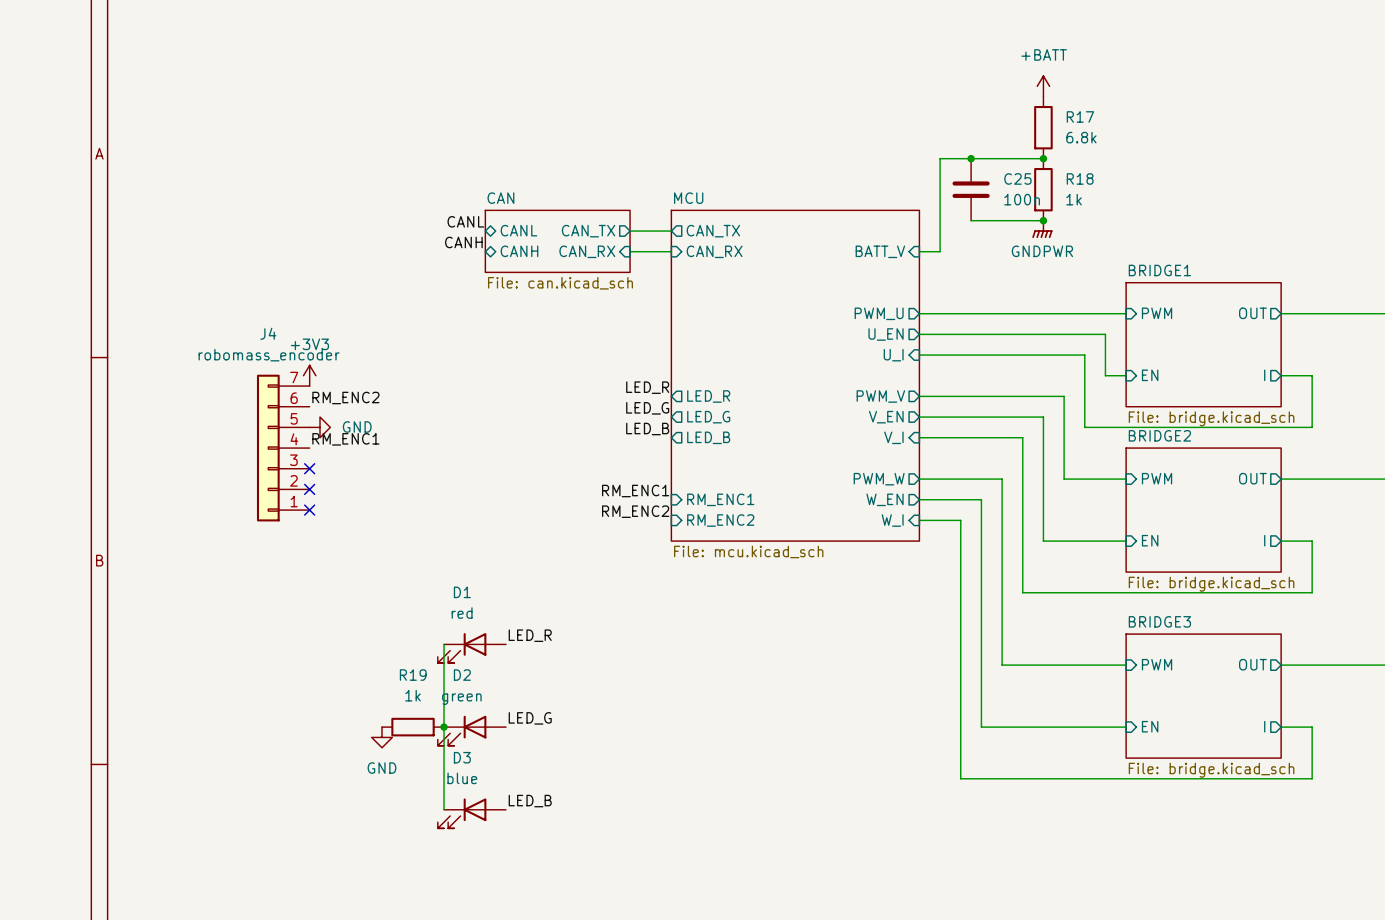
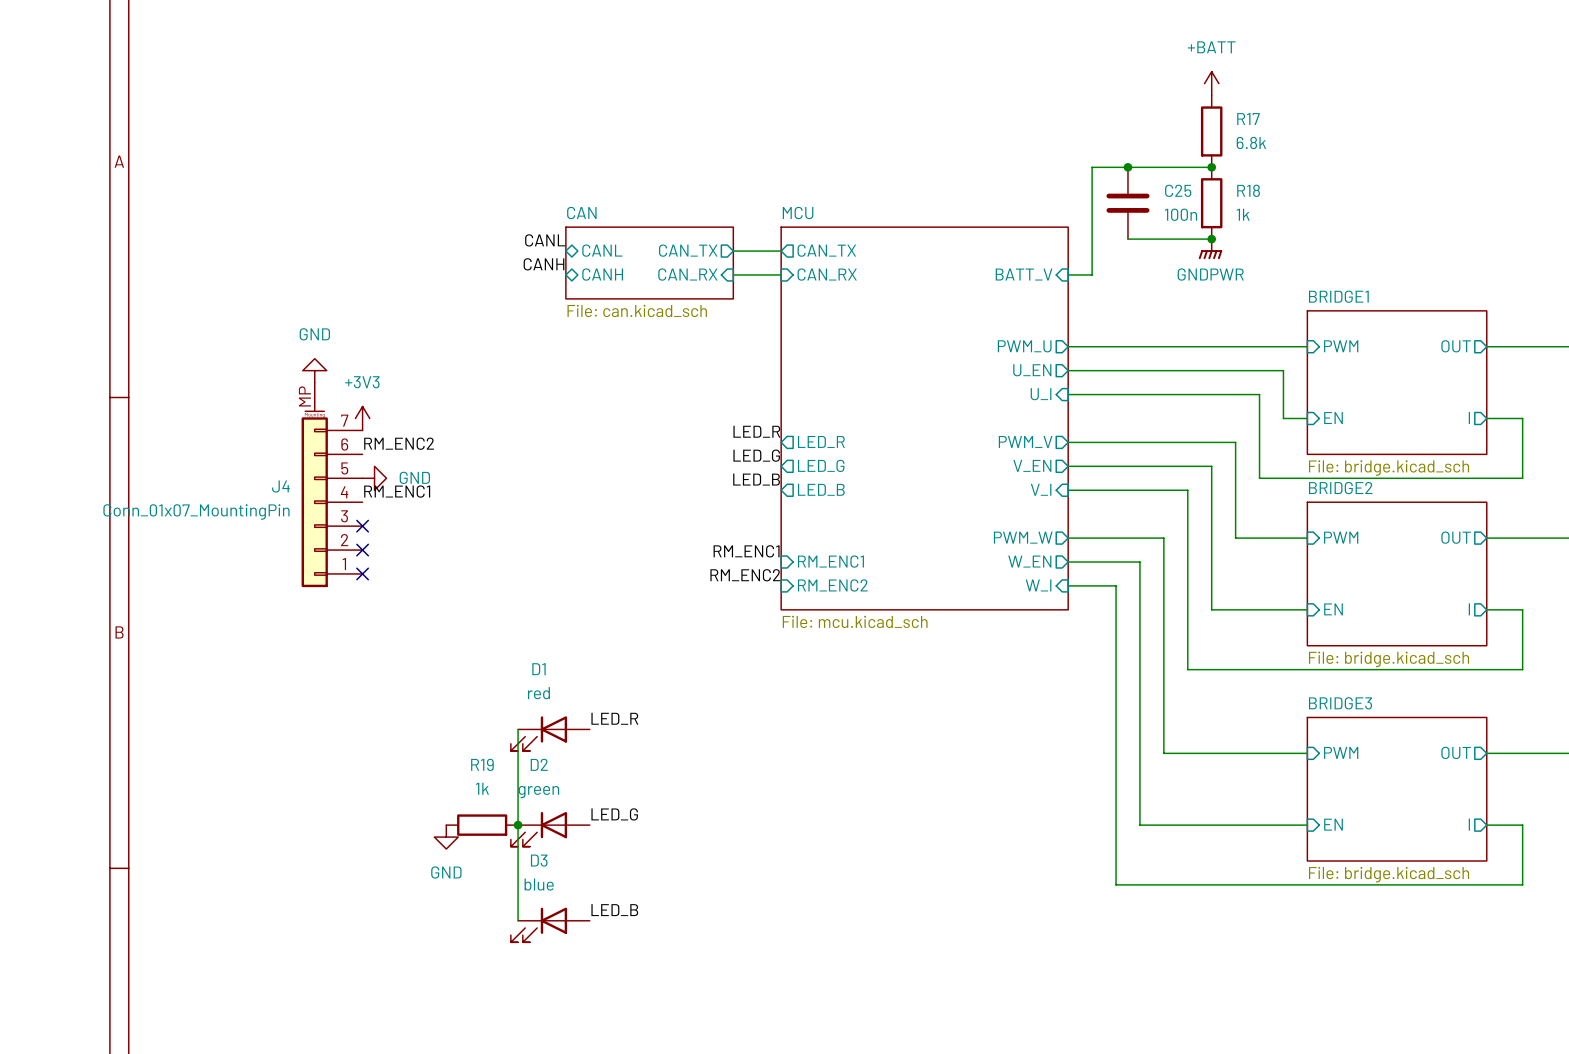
J4 name position: J4 (268, 333) -> J4 (280, 486)
power symbol: none -> GND (314, 370)
J4 value: robomass_encoder (269, 355) -> Conn_01x07_MountingPin (196, 511)
J4 symbol: [256, 374, 310, 522] -> [301, 382, 363, 588]

